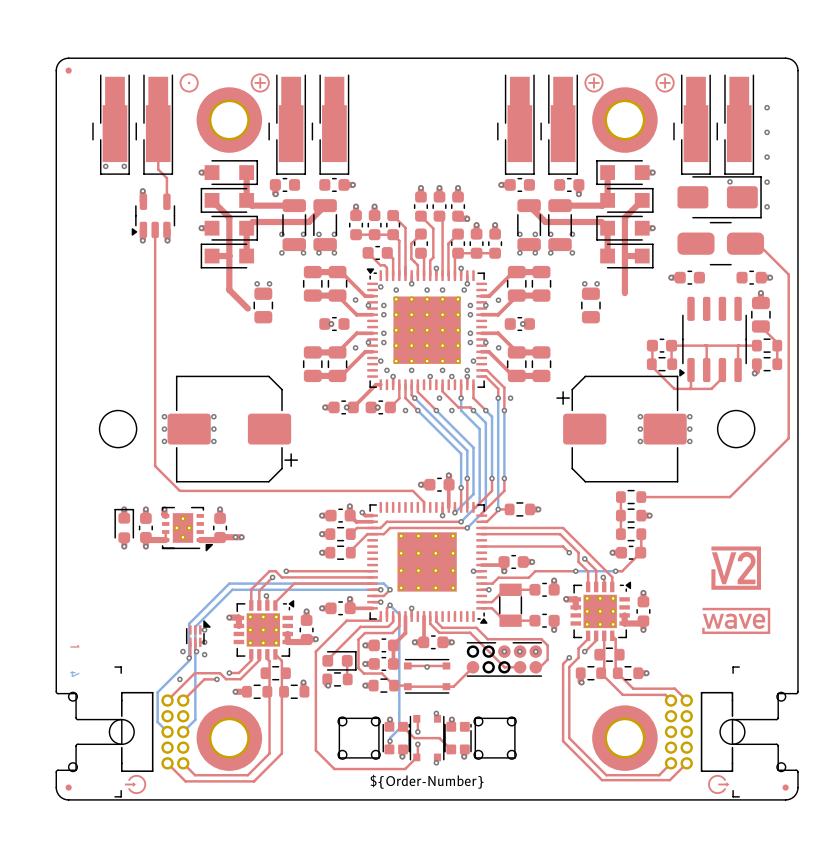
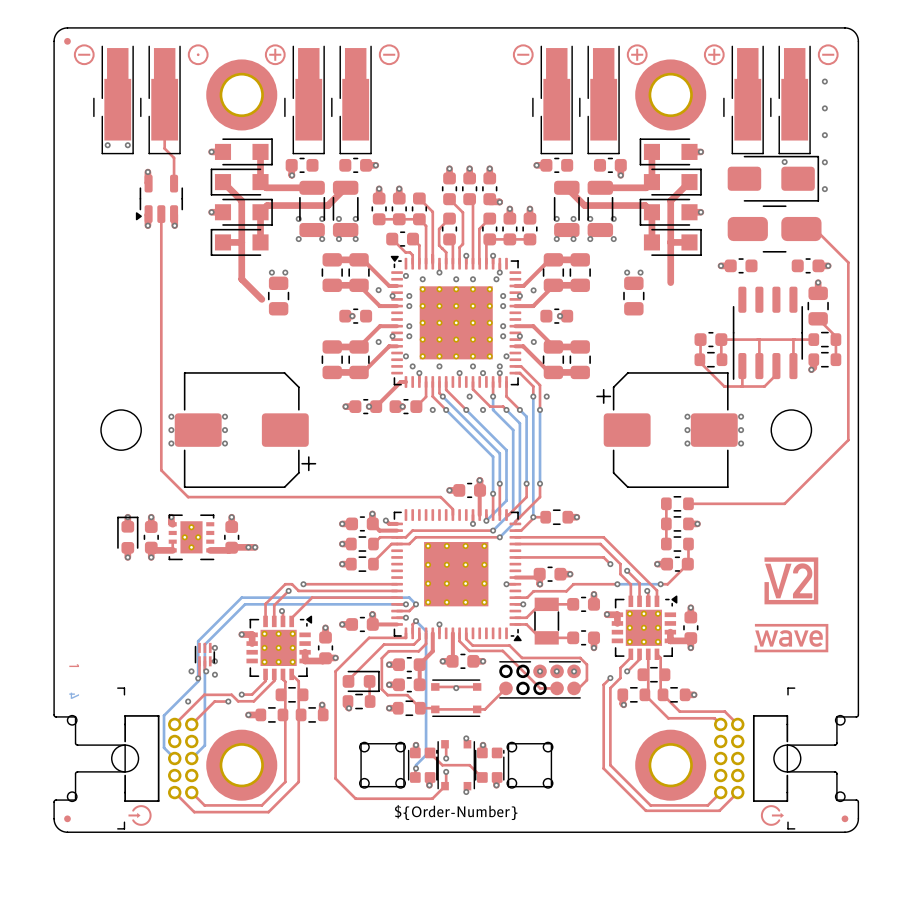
drawing: none -> [73, 44, 95, 66]
drawing: none -> [378, 44, 400, 66]
drawing: none -> [512, 44, 534, 66]
drawing: none -> [817, 44, 839, 66]
part footprint: [679, 296, 747, 383] -> [732, 286, 804, 380]
part footprint: [161, 506, 213, 552] -> [168, 514, 215, 561]
part footprint: [185, 620, 211, 647] -> [194, 642, 216, 667]

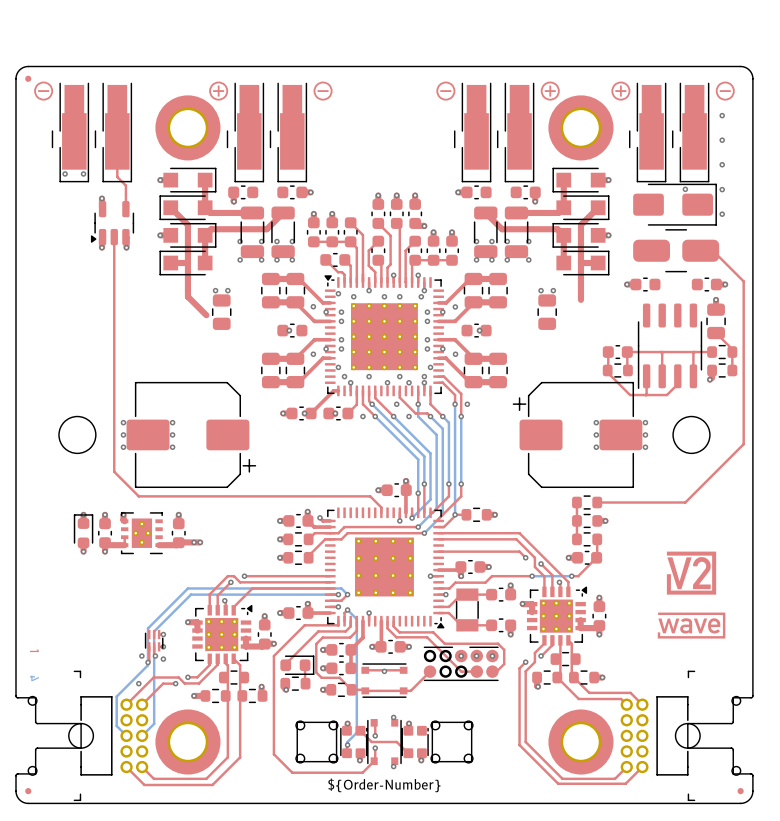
drawing: [187, 44, 209, 66] -> none
drawing: [128, 805, 152, 826] -> none
drawing: [760, 805, 784, 826] -> none

